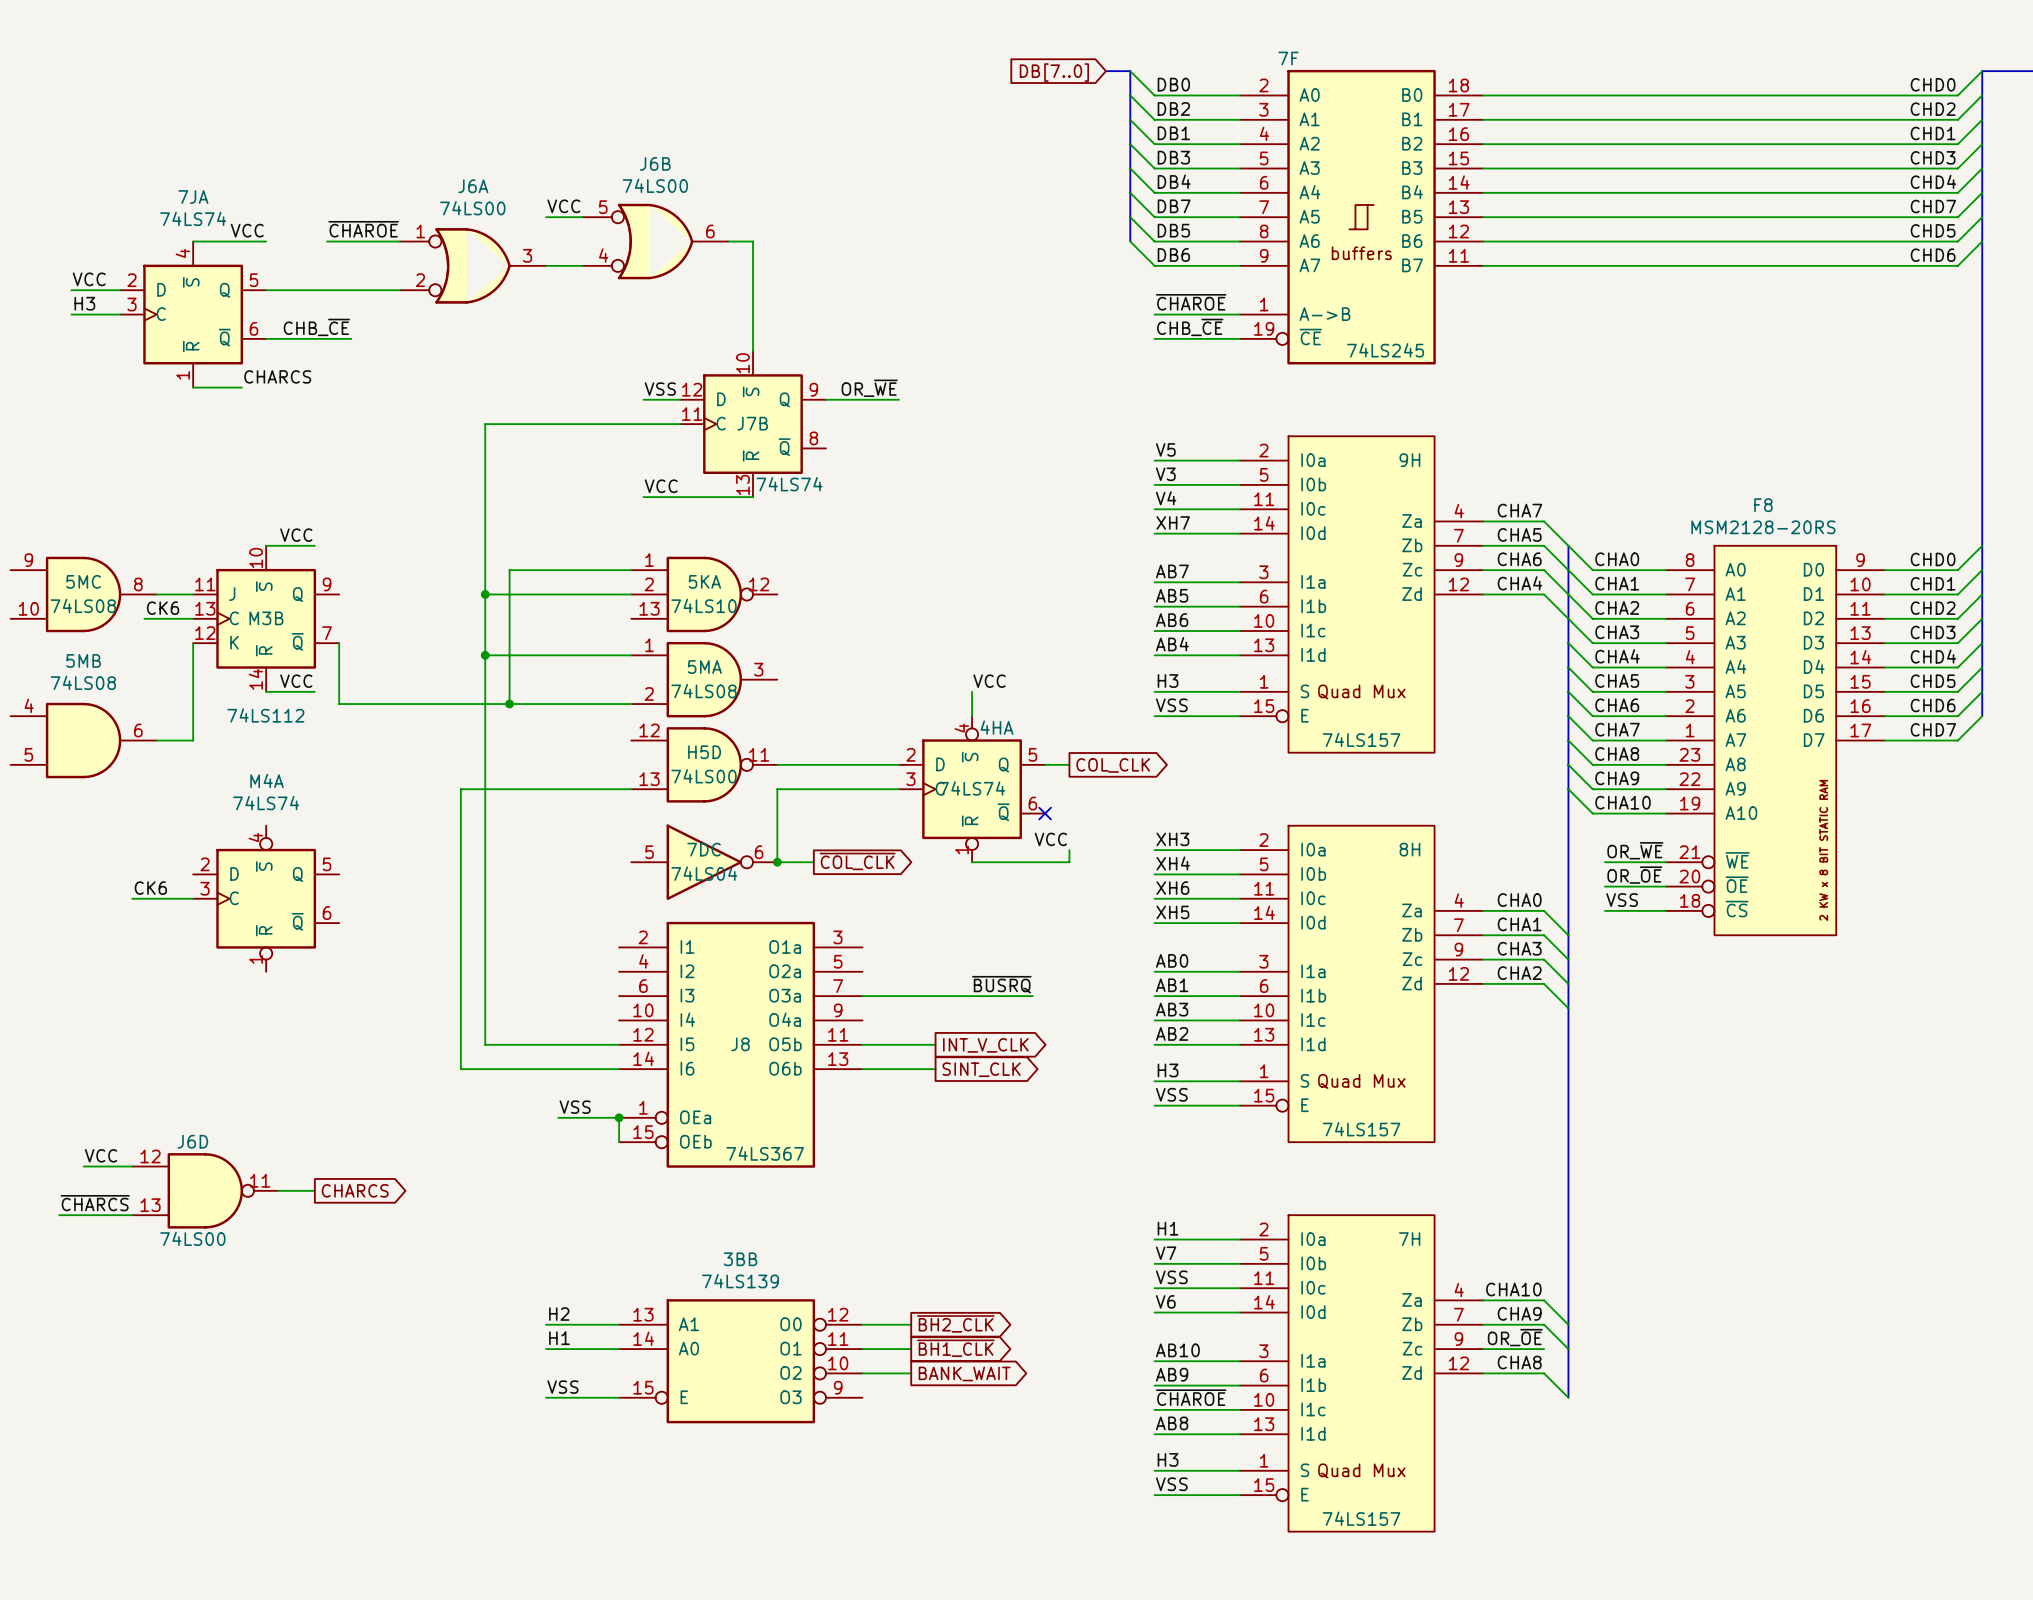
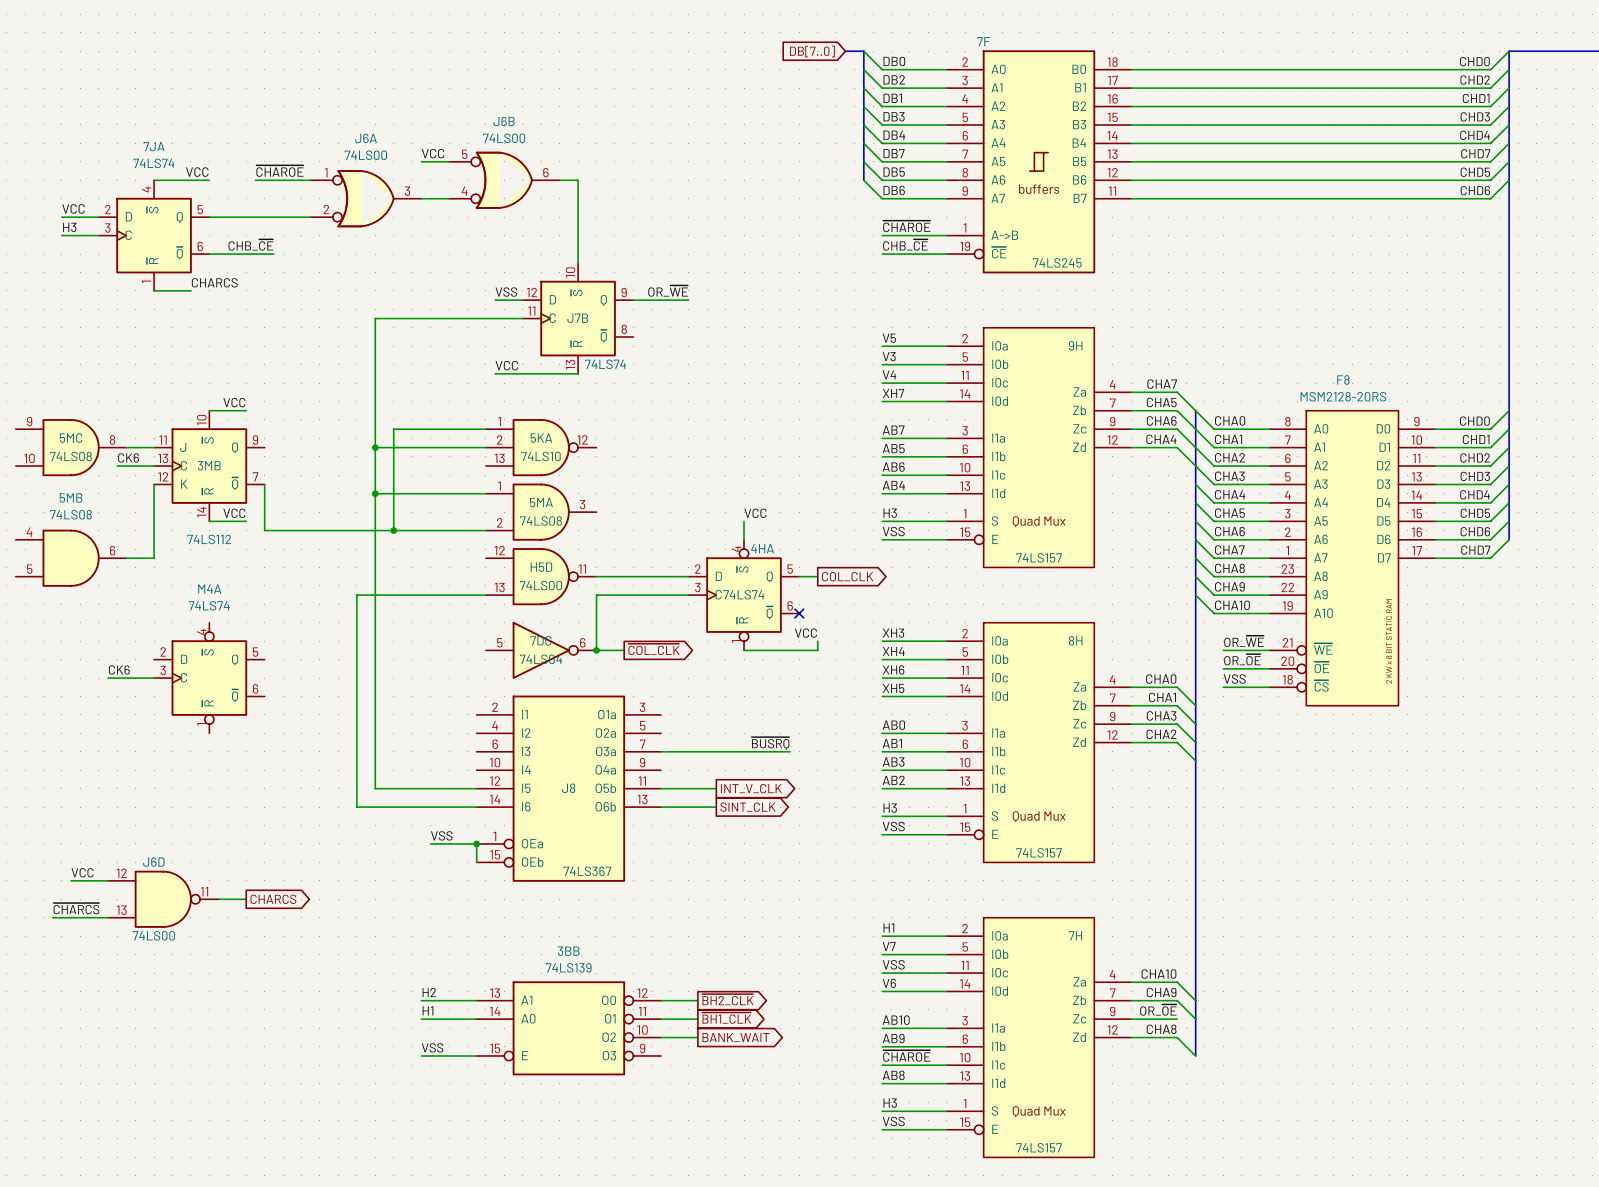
M3B name: M3B (266, 618) -> 3MB (209, 465)

